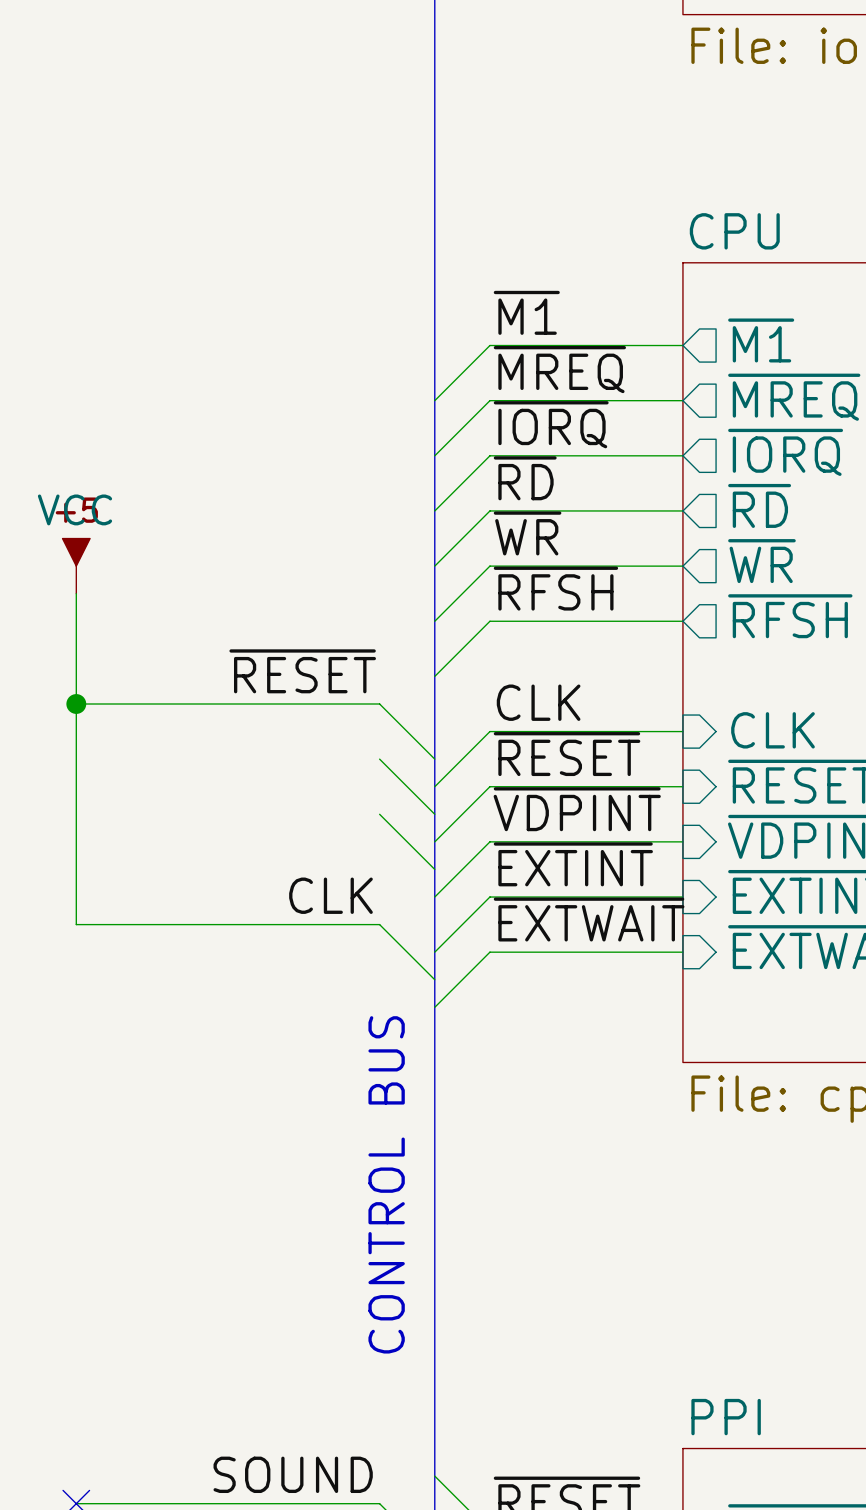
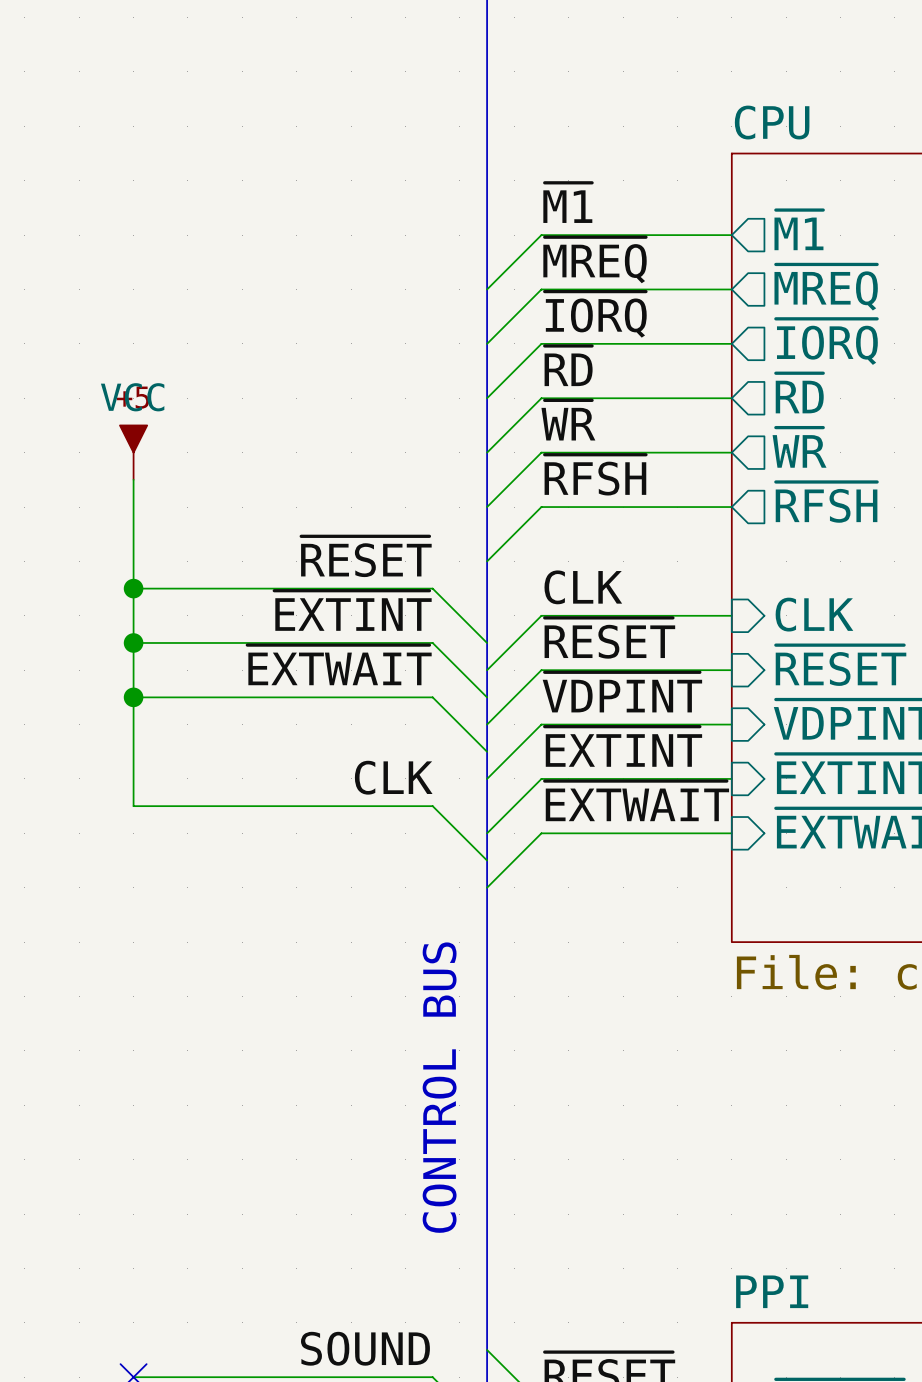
label: none -> ~{EXTINT} (352, 610)
wire: none -> (133, 642) (432, 642)
junction: none -> (133, 642)
label: none -> ~{EXTWAIT} (339, 665)
wire: none -> (133, 697) (432, 697)
junction: none -> (133, 697)

